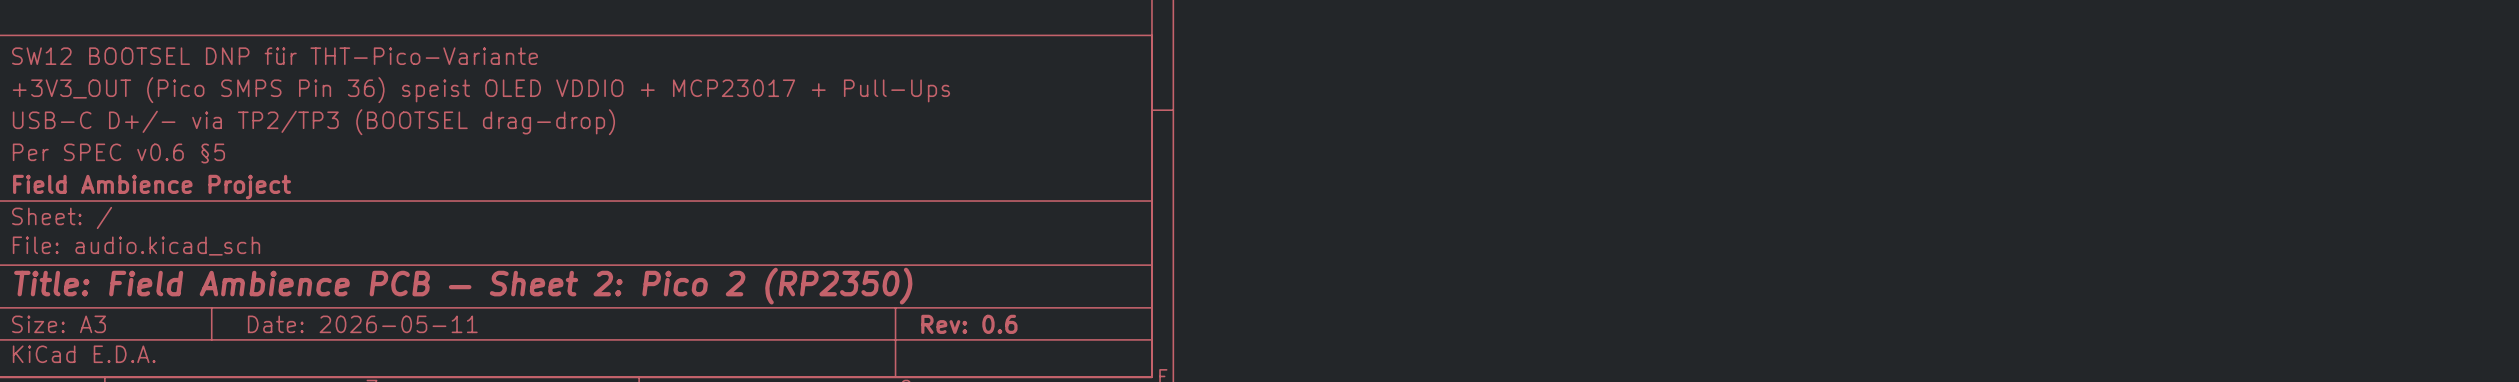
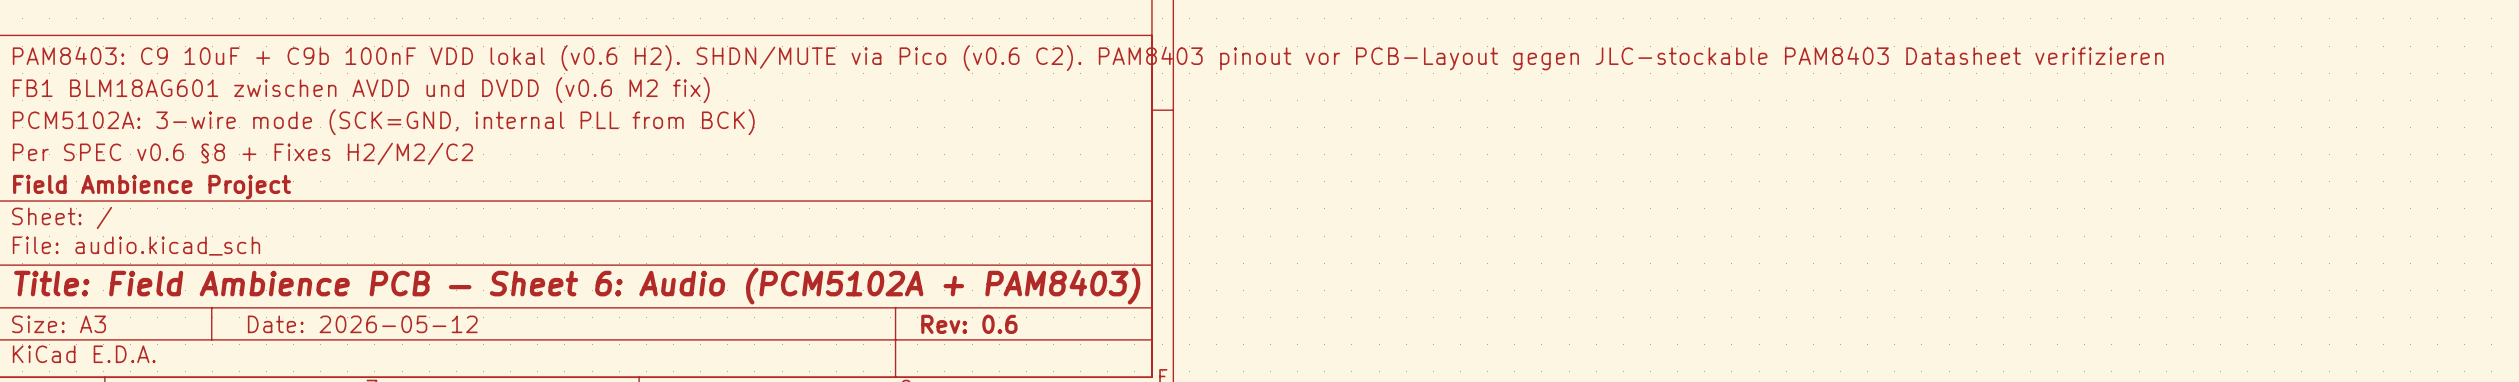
title block: SW12 BOOTSEL DNP für THT-Pico-Variante (274, 56) -> PAM8403: C9 10uF + C9b 100nF VDD lokal (v0.6 H2). SHDN/MUTE via Pico (v0.6 C2). PAM8403 pinout vor PCB-Layout gegen JLC-stockable PAM8403 Datasheet verifizieren (1088, 58)
title block: +3V3_OUT (Pico SMPS Pin 36) speist OLED VDDIO + MCP23017 + Pull-Ups (481, 90) -> FB1 BLM18AG601 zwischen AVDD und DVDD (v0.6 M2 fix) (361, 90)
title block: USB-C D+/- via TP2/TP3 (BOOTSEL drag-drop) (313, 122) -> PCM5102A: 3-wire mode (SCK=GND, internal PLL from BCK) (383, 122)
title block: Per SPEC v0.6 §5 (118, 153) -> Per SPEC v0.6 §8 + Fixes H2/M2/C2 (242, 153)
title block: Title: Field Ambience PCB — Sheet 2: Pico 2 (RP2350) (463, 286) -> Title: Field Ambience PCB — Sheet 6: Audio (PCM5102A + PAM8403) (577, 286)
title block: Date: 2026-05-11 (362, 324) -> Date: 2026-05-12 (362, 324)

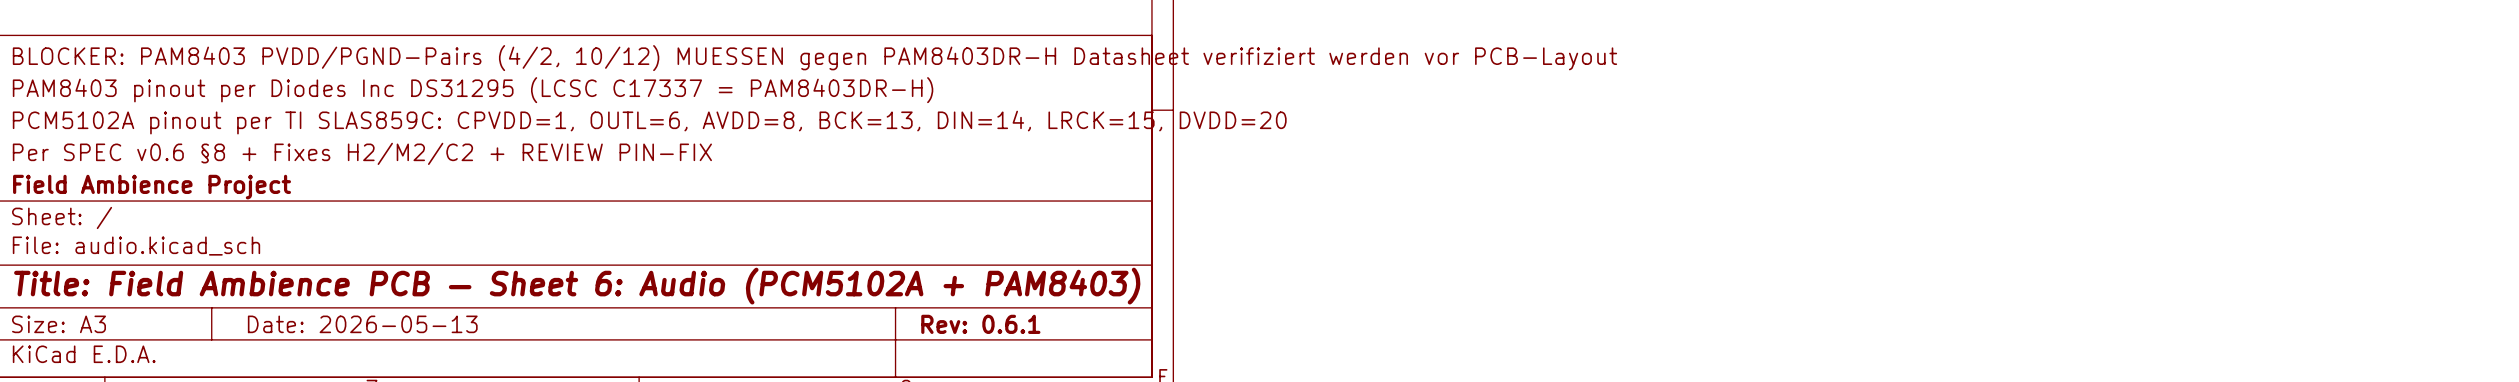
title block: PAM8403: C9 10uF + C9b 100nF VDD lokal (v0.6 H2). SHDN/MUTE via Pico (v0.6 C2). PAM8403 pinout vor PCB-Layout gegen JLC-stockable PAM8403 Datasheet verifizieren (1088, 58) -> BLOCKER: PAM8403 PVDD/PGND-Pairs (4/2, 10/12) MUESSEN gegen PAM8403DR-H Datasheet verifiziert werden vor PCB-Layout (814, 58)
title block: FB1 BLM18AG601 zwischen AVDD und DVDD (v0.6 M2 fix) (361, 90) -> PAM8403 pinout per Diodes Inc DS31295 (LCSC C17337 = PAM8403DR-H) (473, 90)
title block: PCM5102A: 3-wire mode (SCK=GND, internal PLL from BCK) (383, 122) -> PCM5102A pinout per TI SLAS859C: CPVDD=1, OUTL=6, AVDD=8, BCK=13, DIN=14, LRCK=15, DVDD=20 (649, 122)
title block: Per SPEC v0.6 §8 + Fixes H2/M2/C2 (242, 153) -> Per SPEC v0.6 §8 + Fixes H2/M2/C2 + REVIEW PIN-FIX (362, 153)
title block: Date: 2026-05-12 (362, 324) -> Date: 2026-05-13 (362, 324)
title block: Rev: 0.6 (969, 324) -> Rev: 0.6.1 (980, 324)

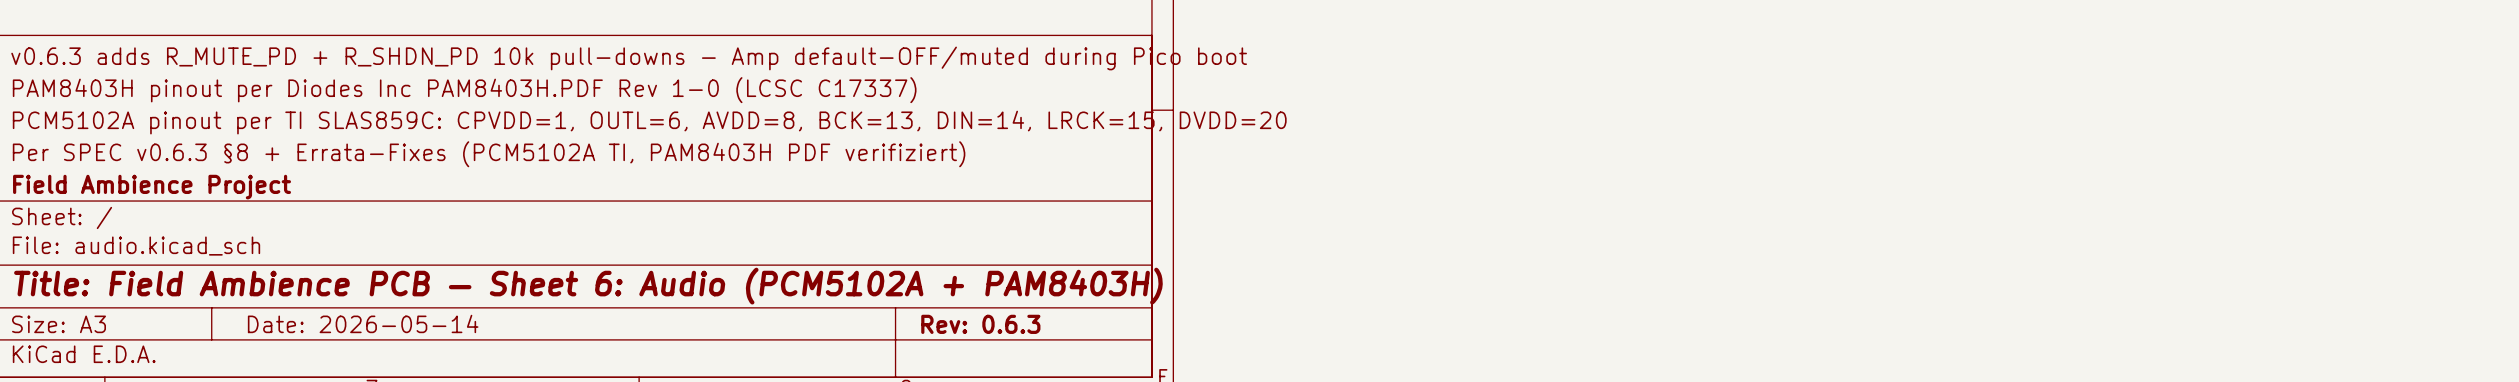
title block: BLOCKER: PAM8403 PVDD/PGND-Pairs (4/2, 10/12) MUESSEN gegen PAM8403DR-H Datasheet verifiziert werden vor PCB-Layout (814, 58) -> v0.6.3 adds R_MUTE_PD + R_SHDN_PD 10k pull-downs - Amp default-OFF/muted during Pico boot (629, 58)
title block: PAM8403 pinout per Diodes Inc DS31295 (LCSC C17337 = PAM8403DR-H) (473, 90) -> PAM8403H pinout per Diodes Inc PAM8403H.PDF Rev 1-0 (LCSC C17337) (464, 90)
title block: Per SPEC v0.6 §8 + Fixes H2/M2/C2 + REVIEW PIN-FIX (362, 153) -> Per SPEC v0.6.3 §8 + Errata-Fixes (PCM5102A TI, PAM8403H PDF verifiziert) (489, 154)
title block: Title: Field Ambience PCB — Sheet 6: Audio (PCM5102A + PAM8403) (577, 286) -> Title: Field Ambience PCB — Sheet 6: Audio (PCM5102A + PAM8403H) (588, 286)
title block: Date: 2026-05-13 (362, 324) -> Date: 2026-05-14 (363, 323)
title block: Rev: 0.6.1 (980, 324) -> Rev: 0.6.3 (980, 324)

